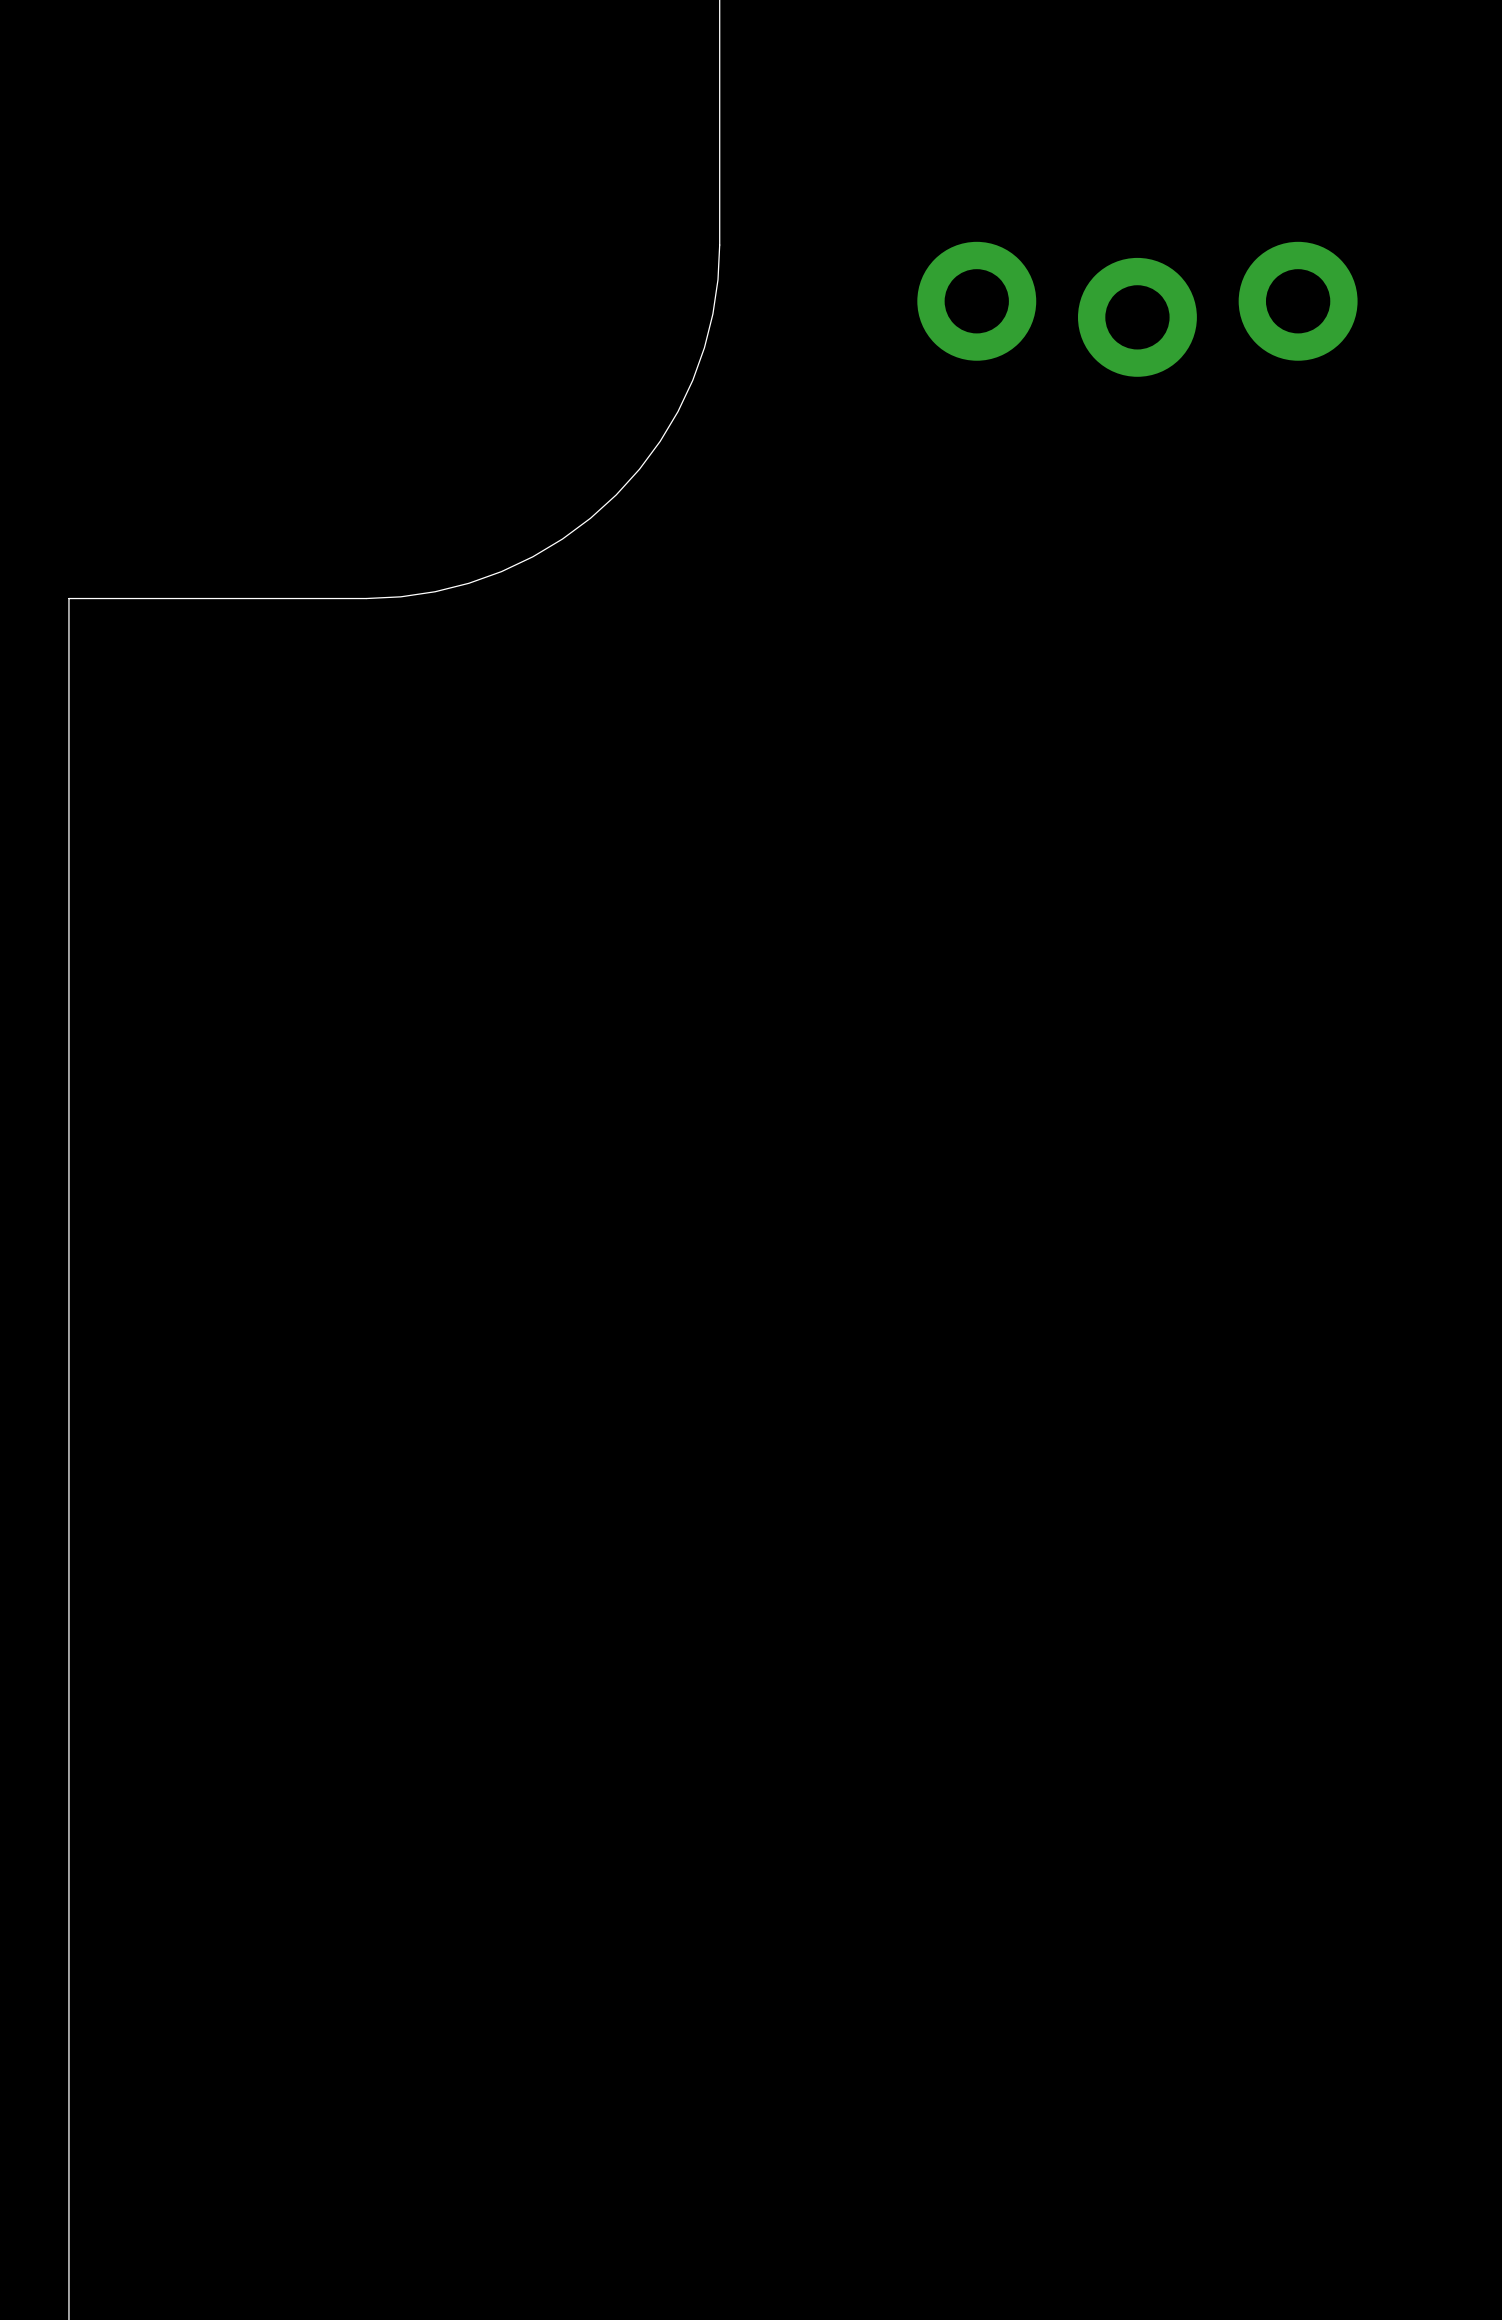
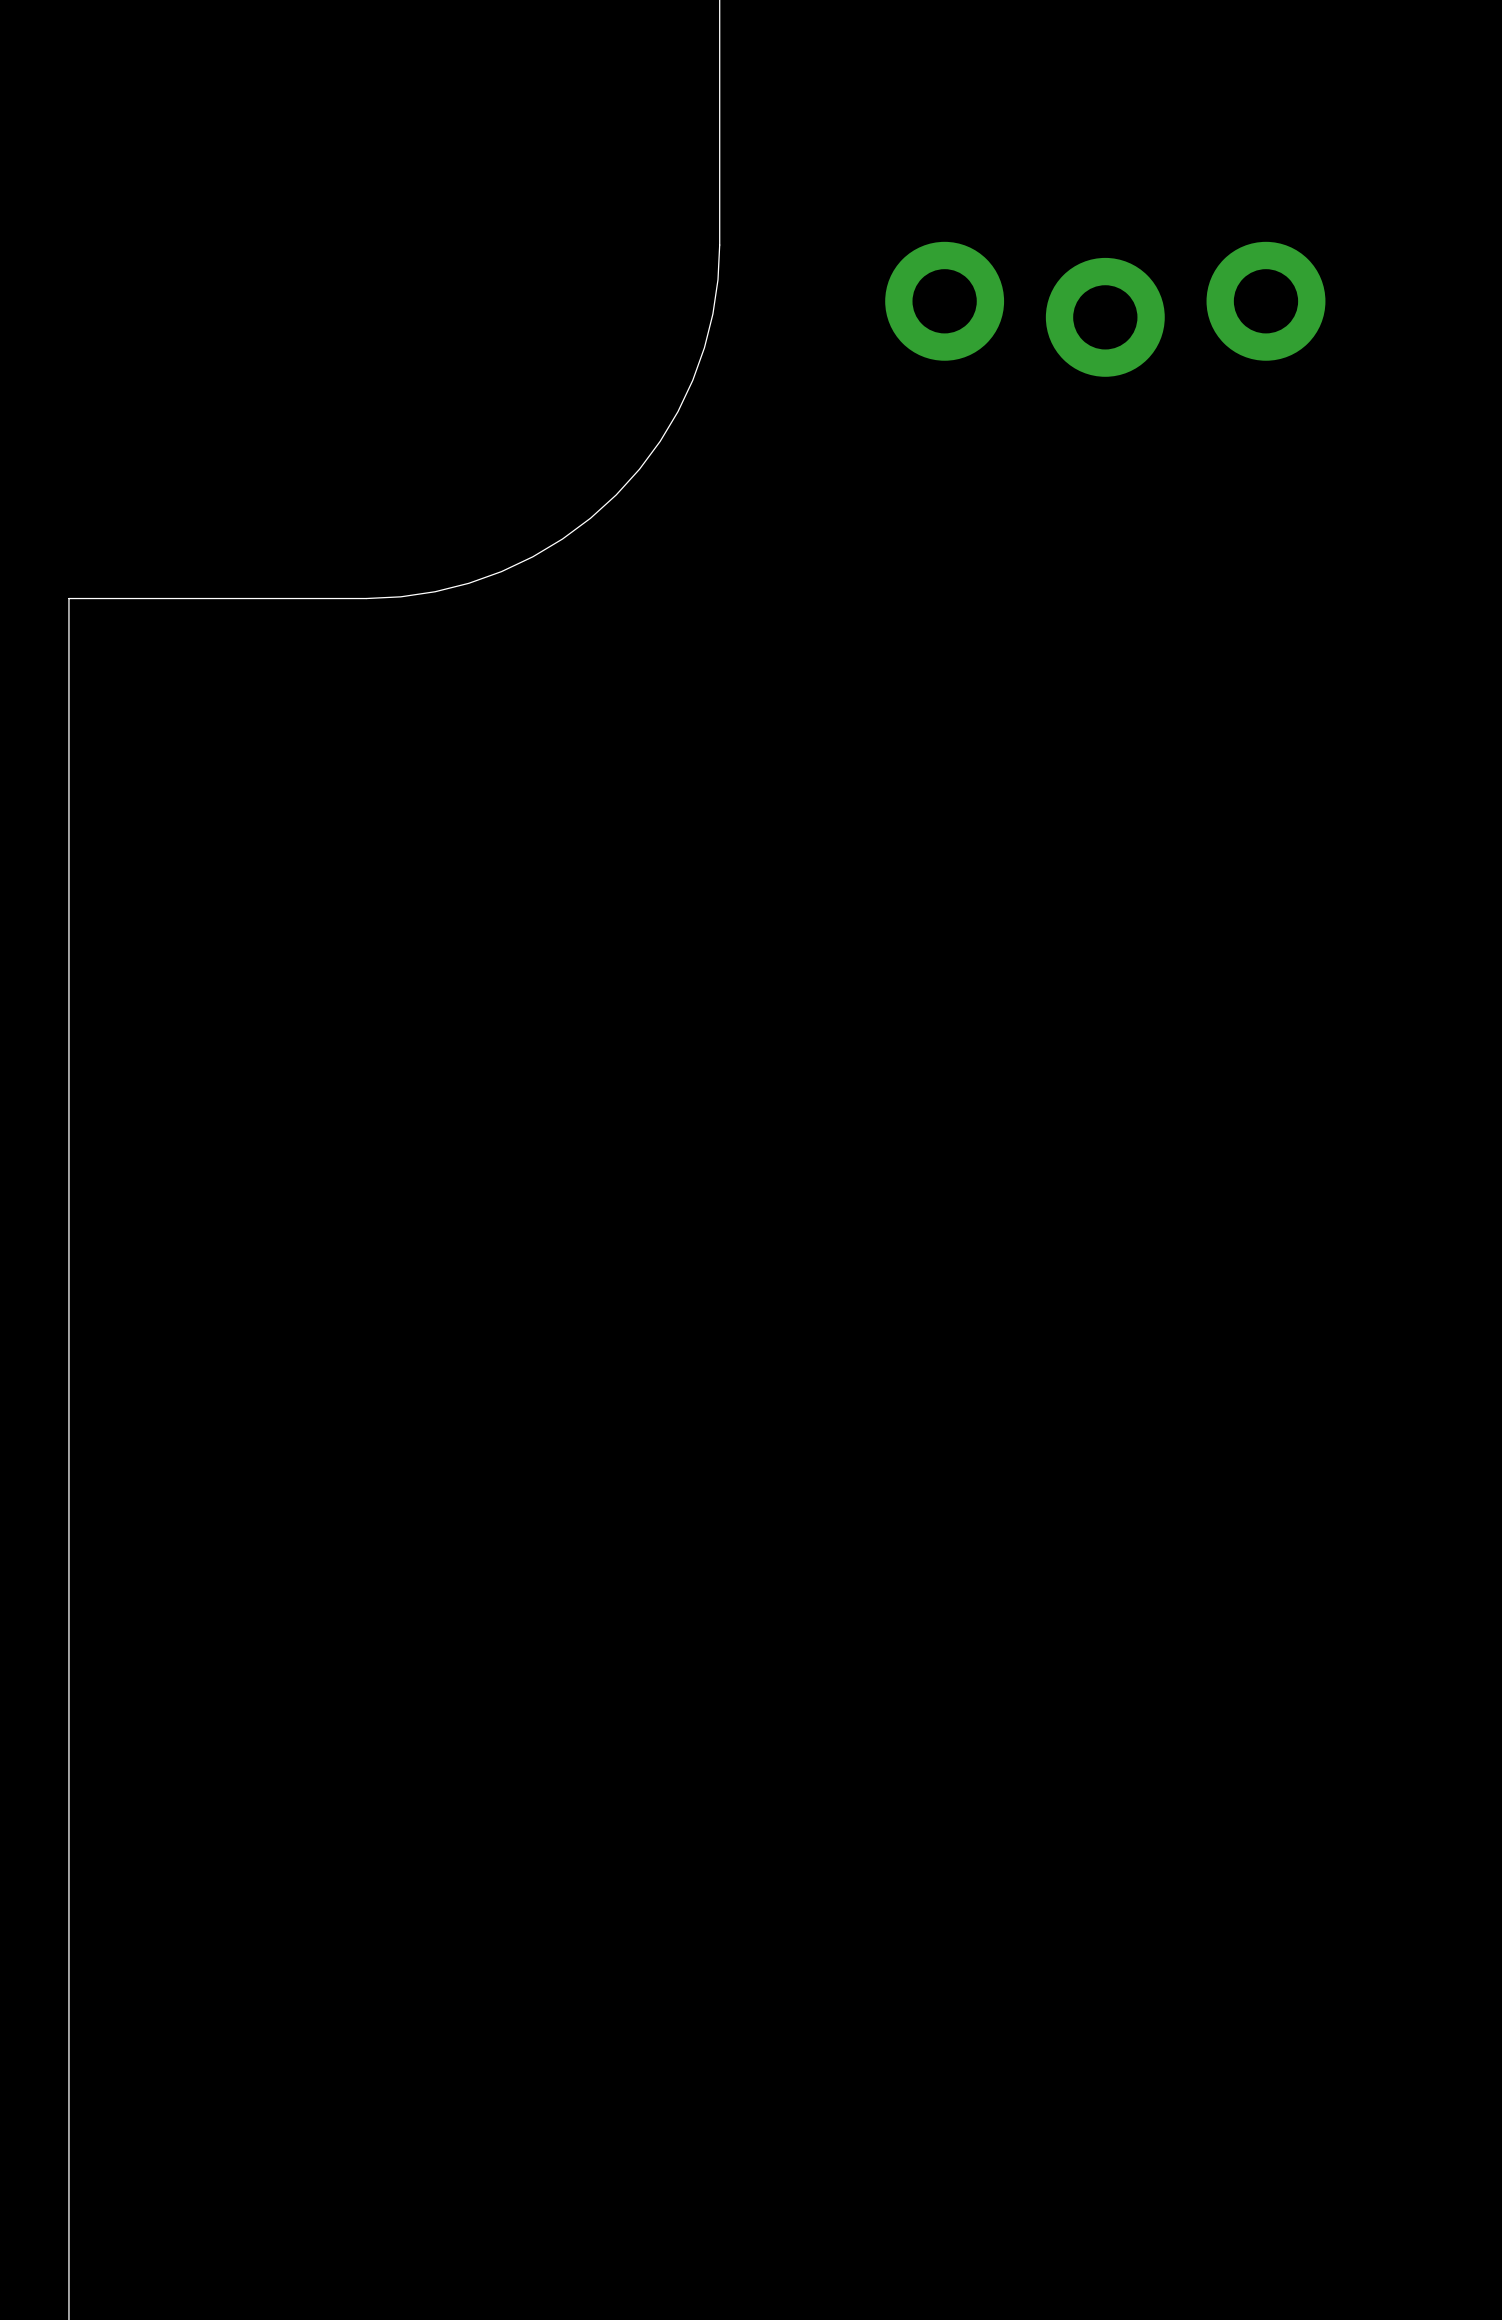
part position: (1137, 309) -> (1105, 309)

